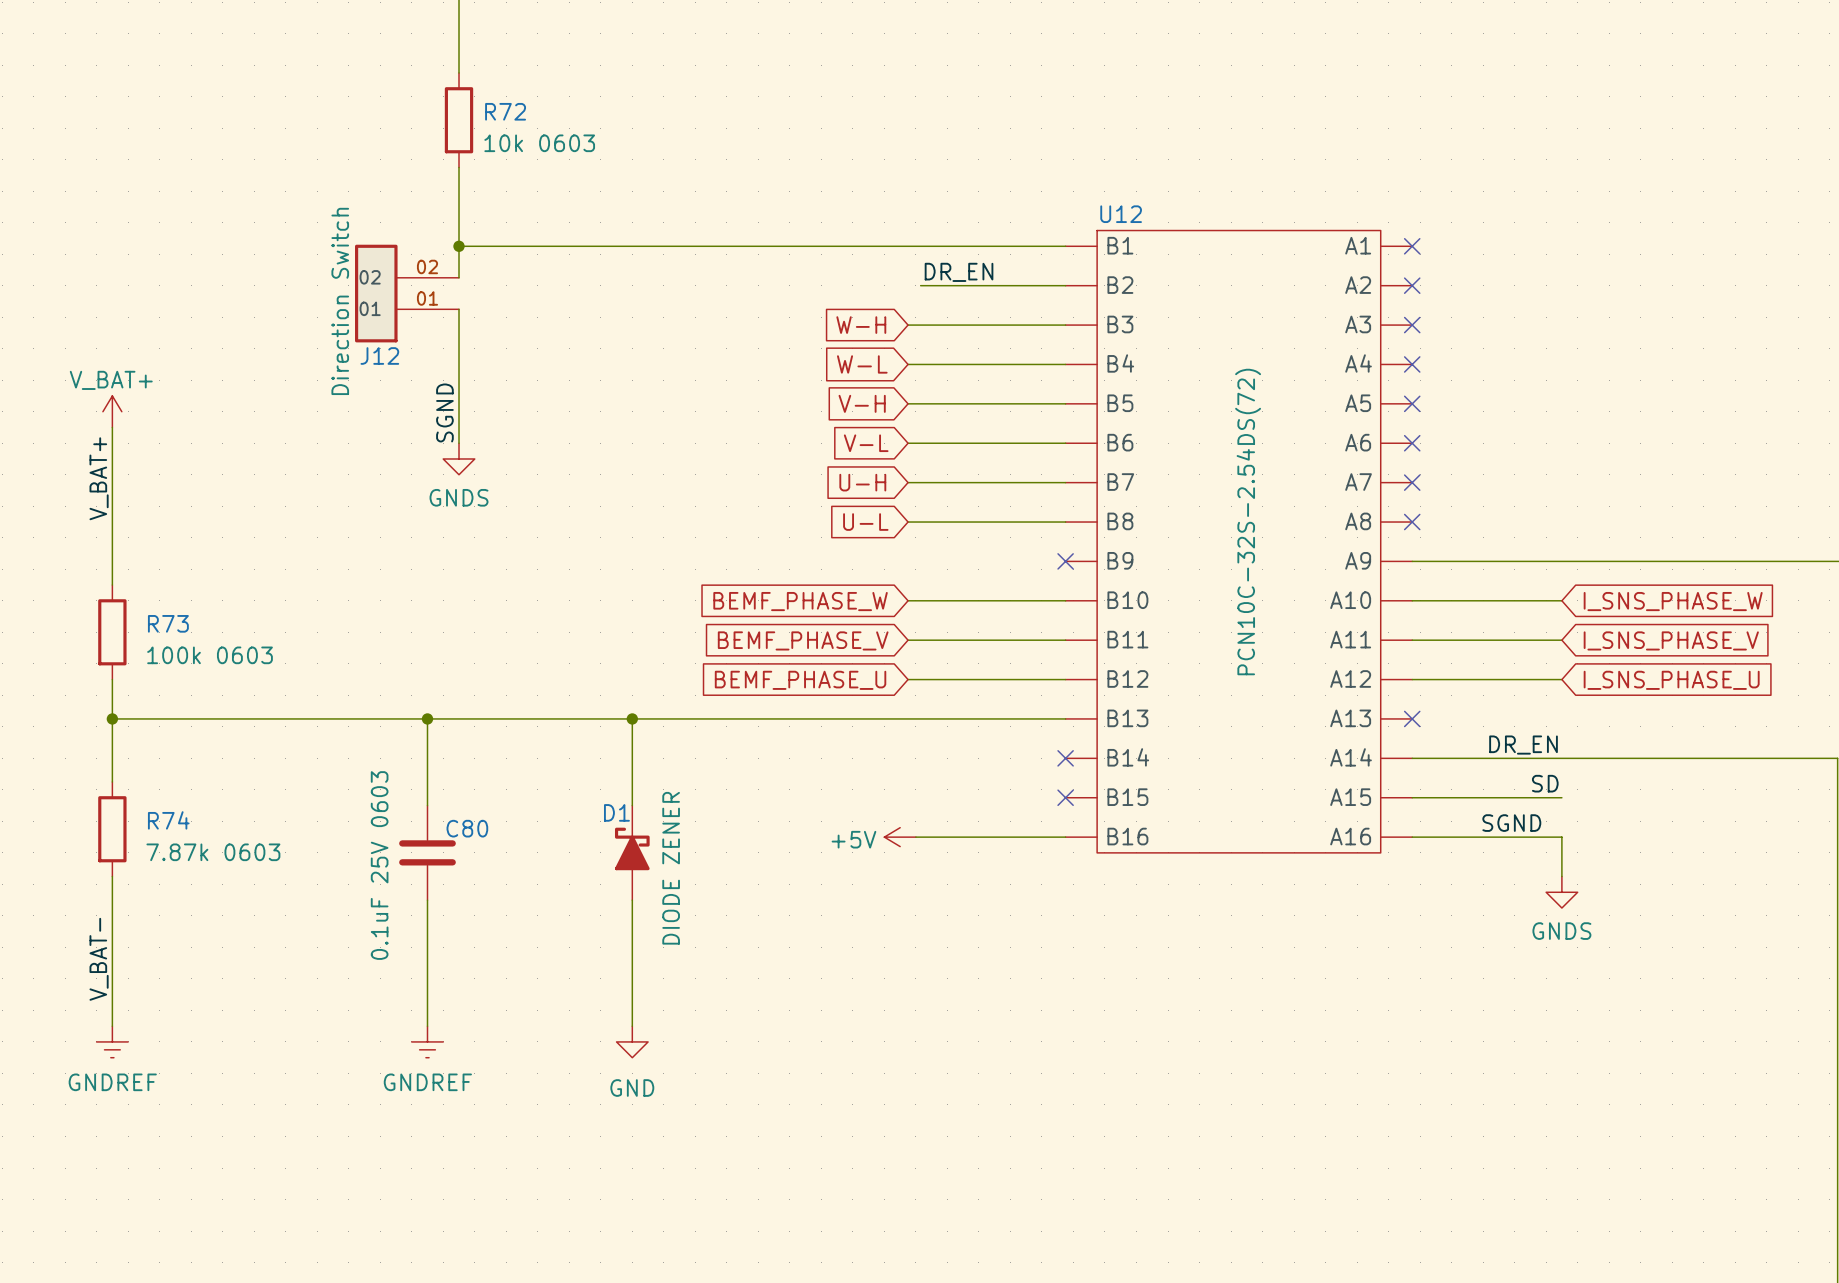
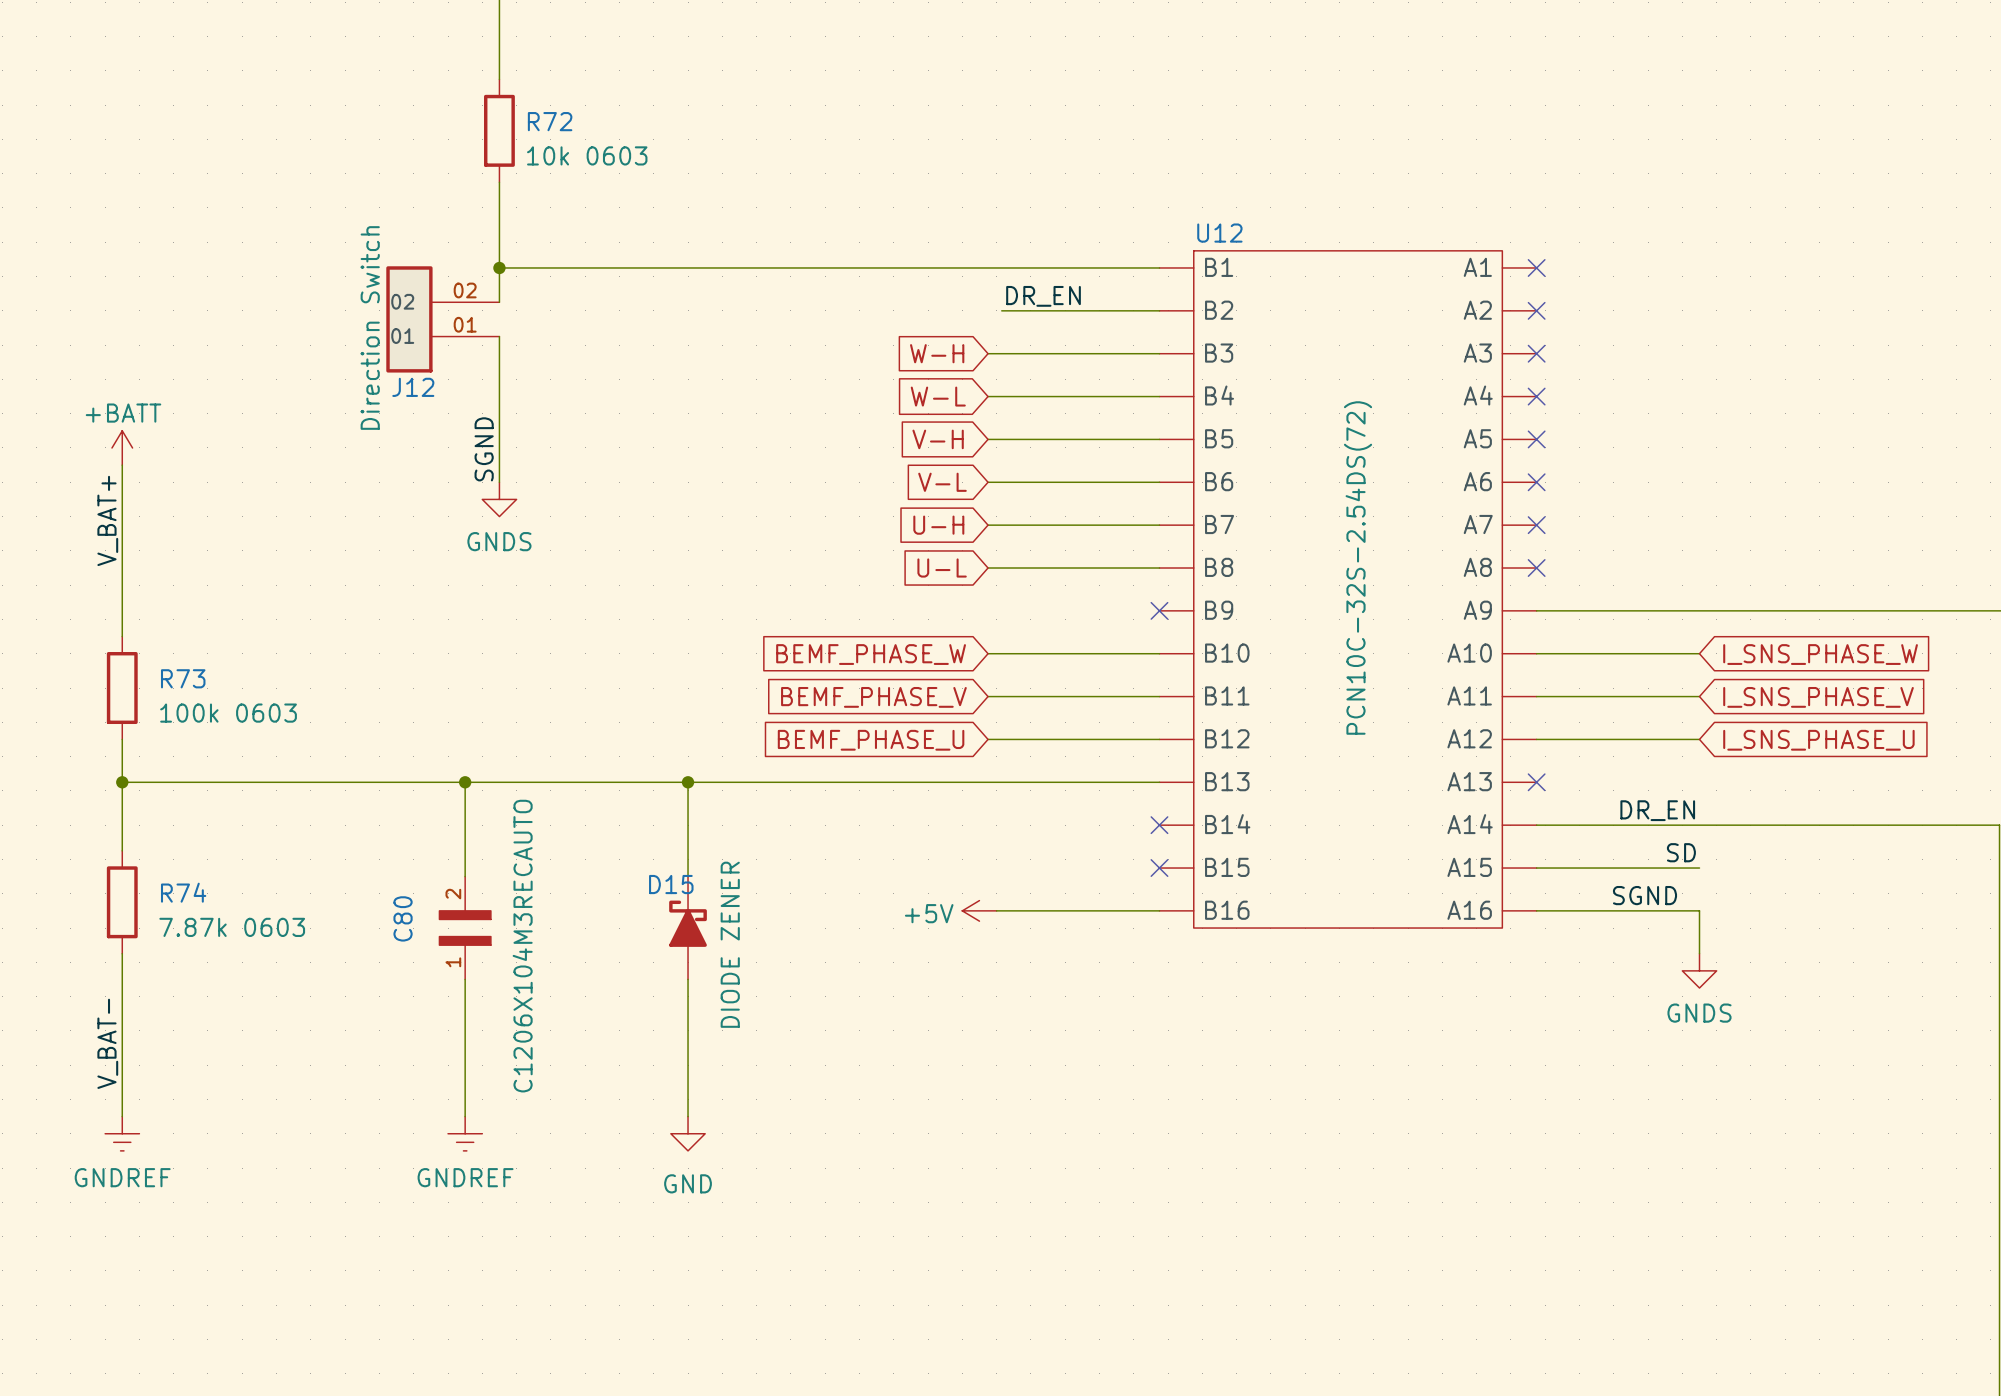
power symbol: V_BAT+ (112, 411) -> +BATT (122, 447)
C80 symbol: [399, 805, 456, 901] -> [438, 876, 492, 980]
D1 name: D1 (616, 812) -> D15 (671, 884)
C80 name position: C80 (467, 828) -> C80 (403, 918)
C80 value: 0.1uF 25V 0603 (379, 865) -> C1206X104M3RECAUTO (522, 946)

